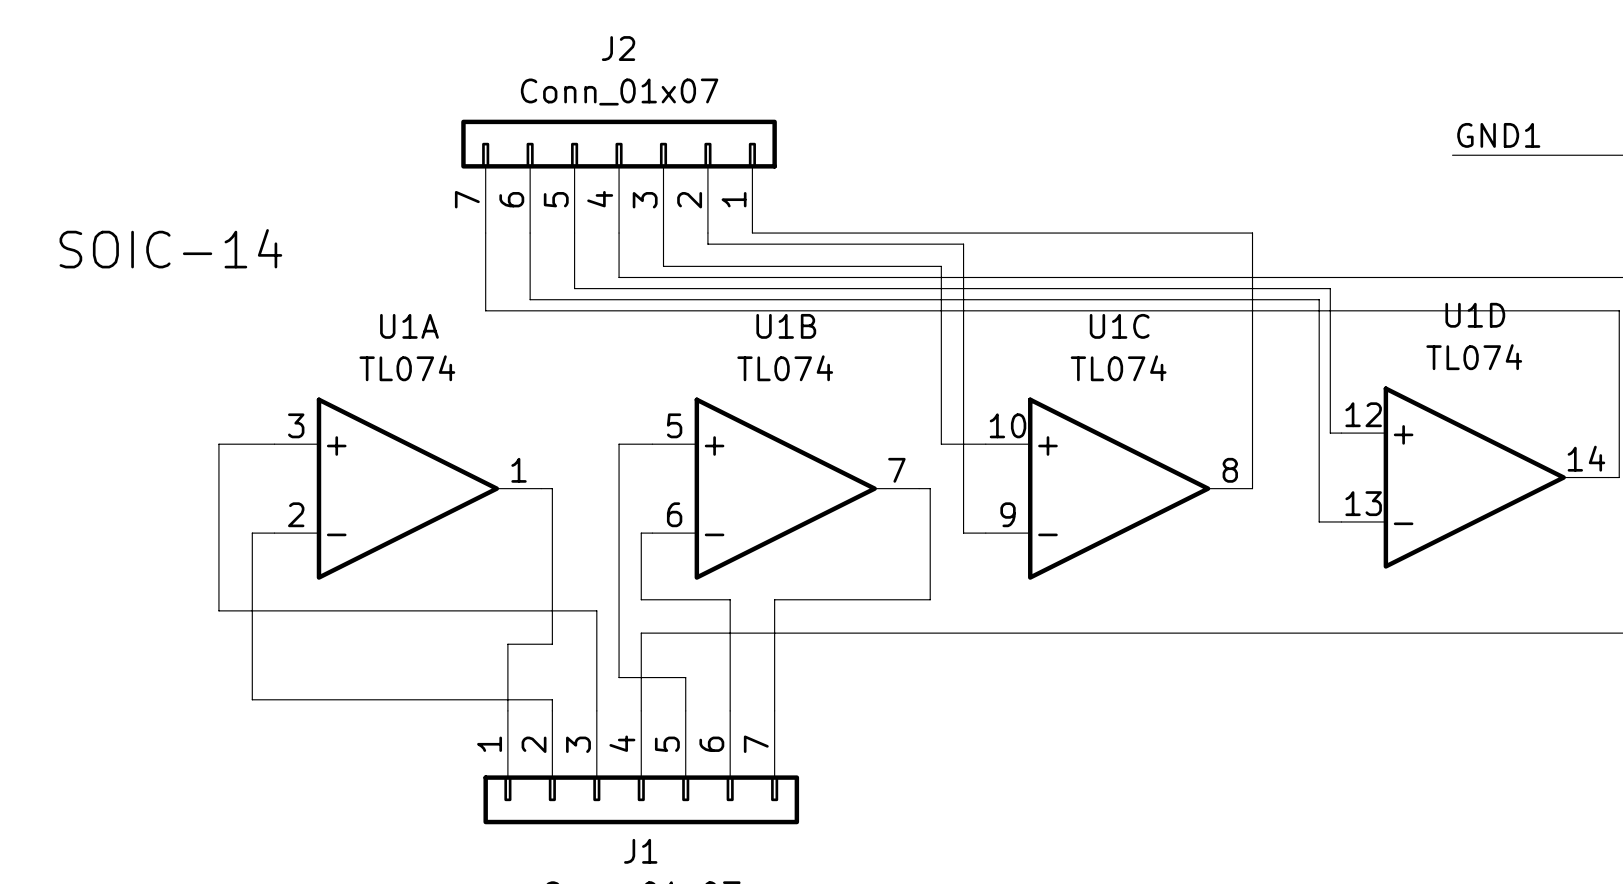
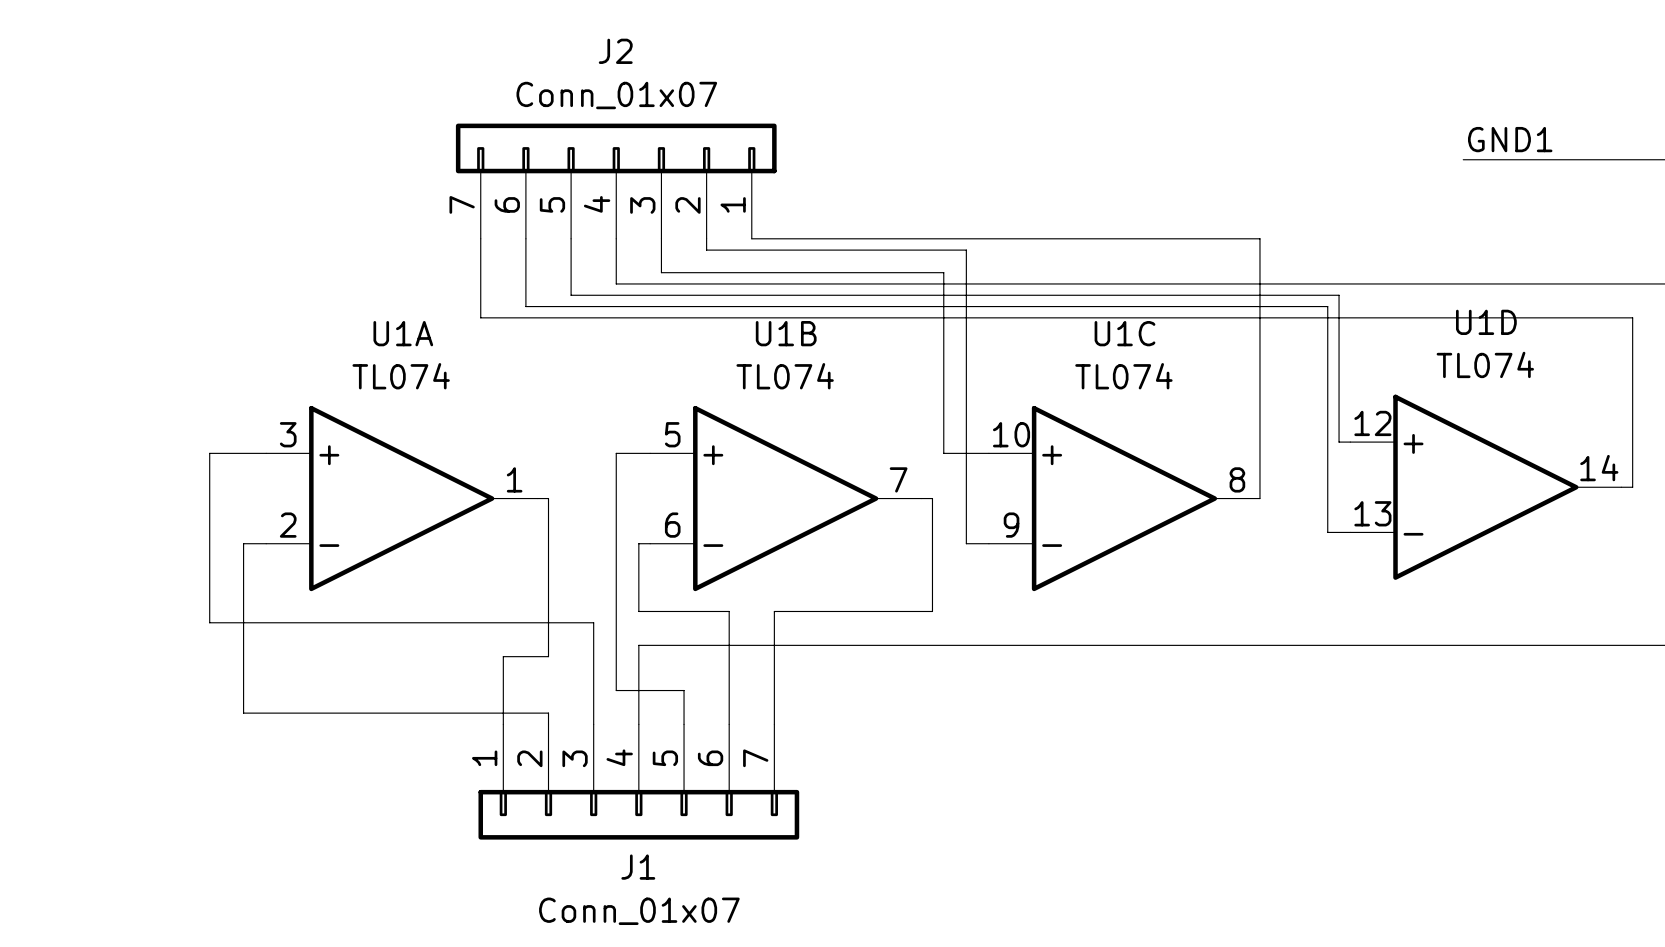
text: SOIC-14 (170, 248) -> none

